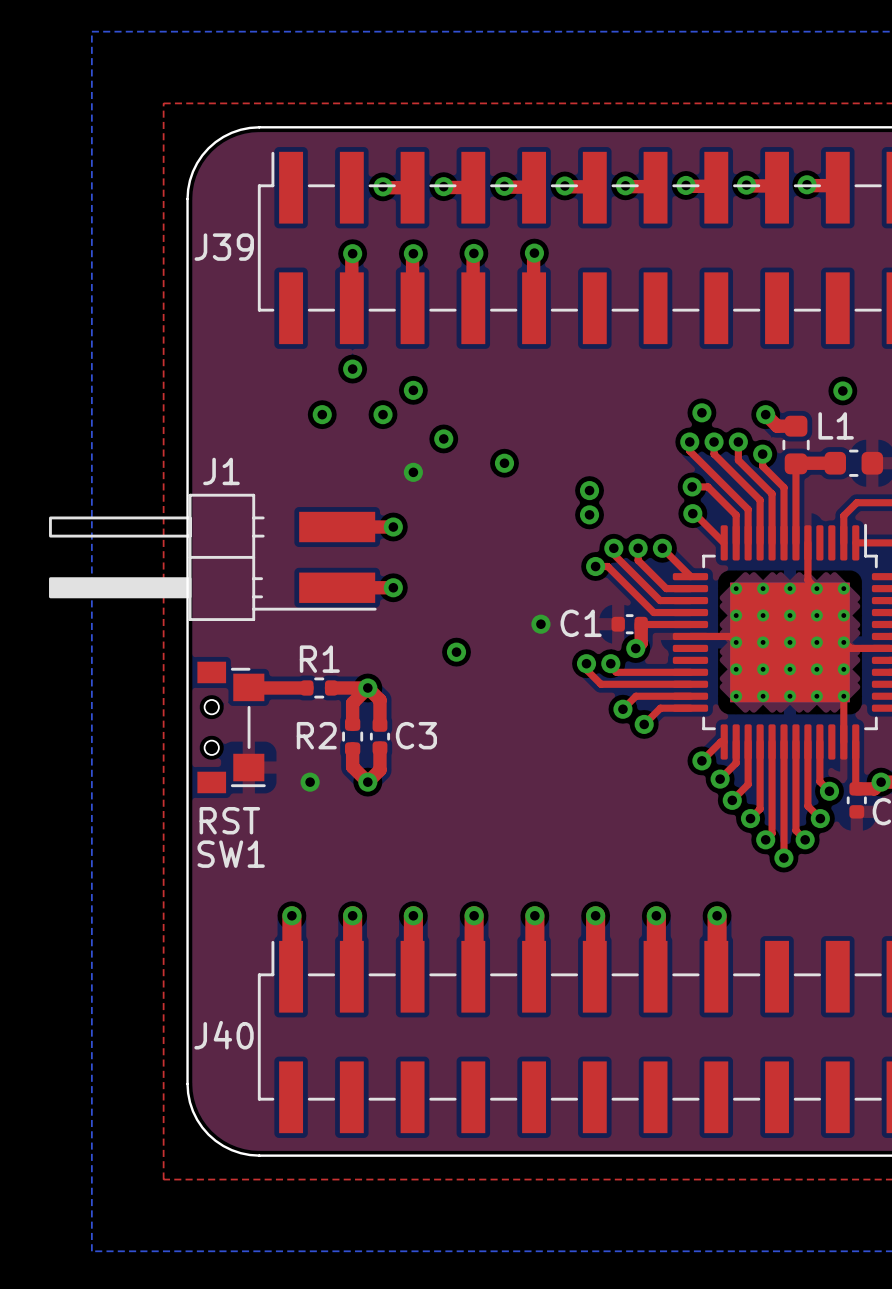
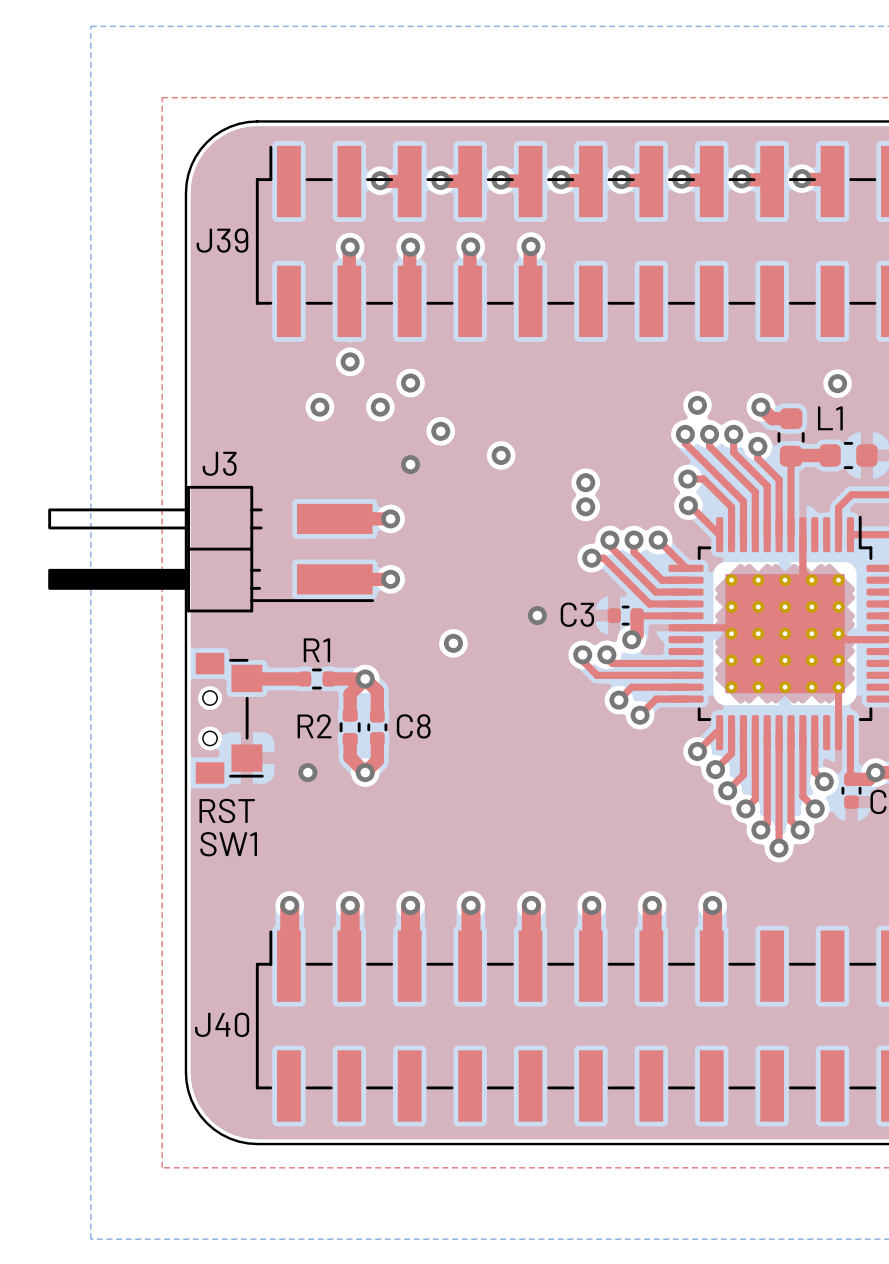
J1 name: J1 (221, 471) -> J3 (219, 463)
C1 name: C1 (581, 623) -> C3 (577, 614)
C3 name: C3 (416, 735) -> C8 (413, 726)

